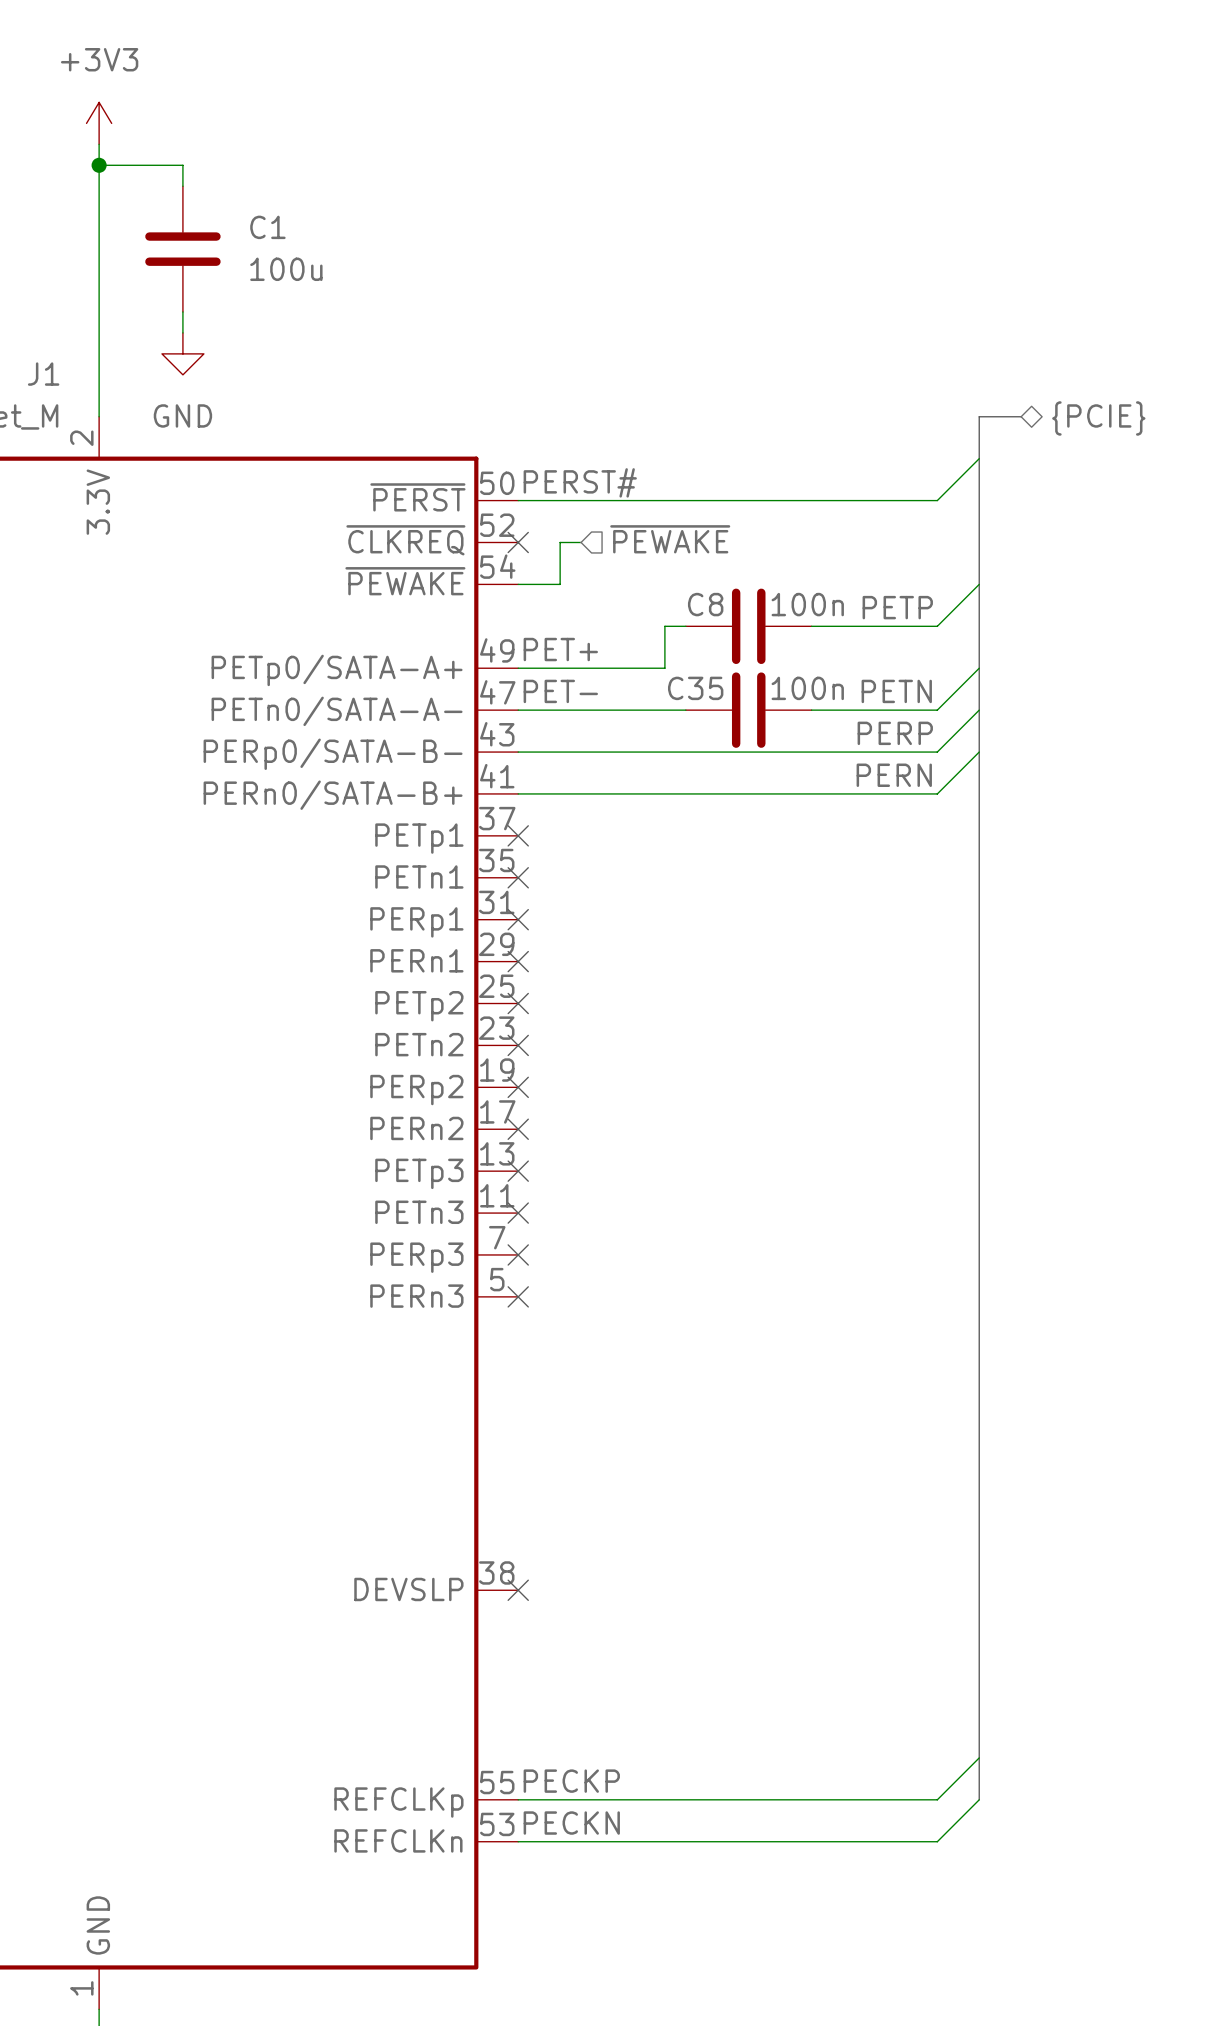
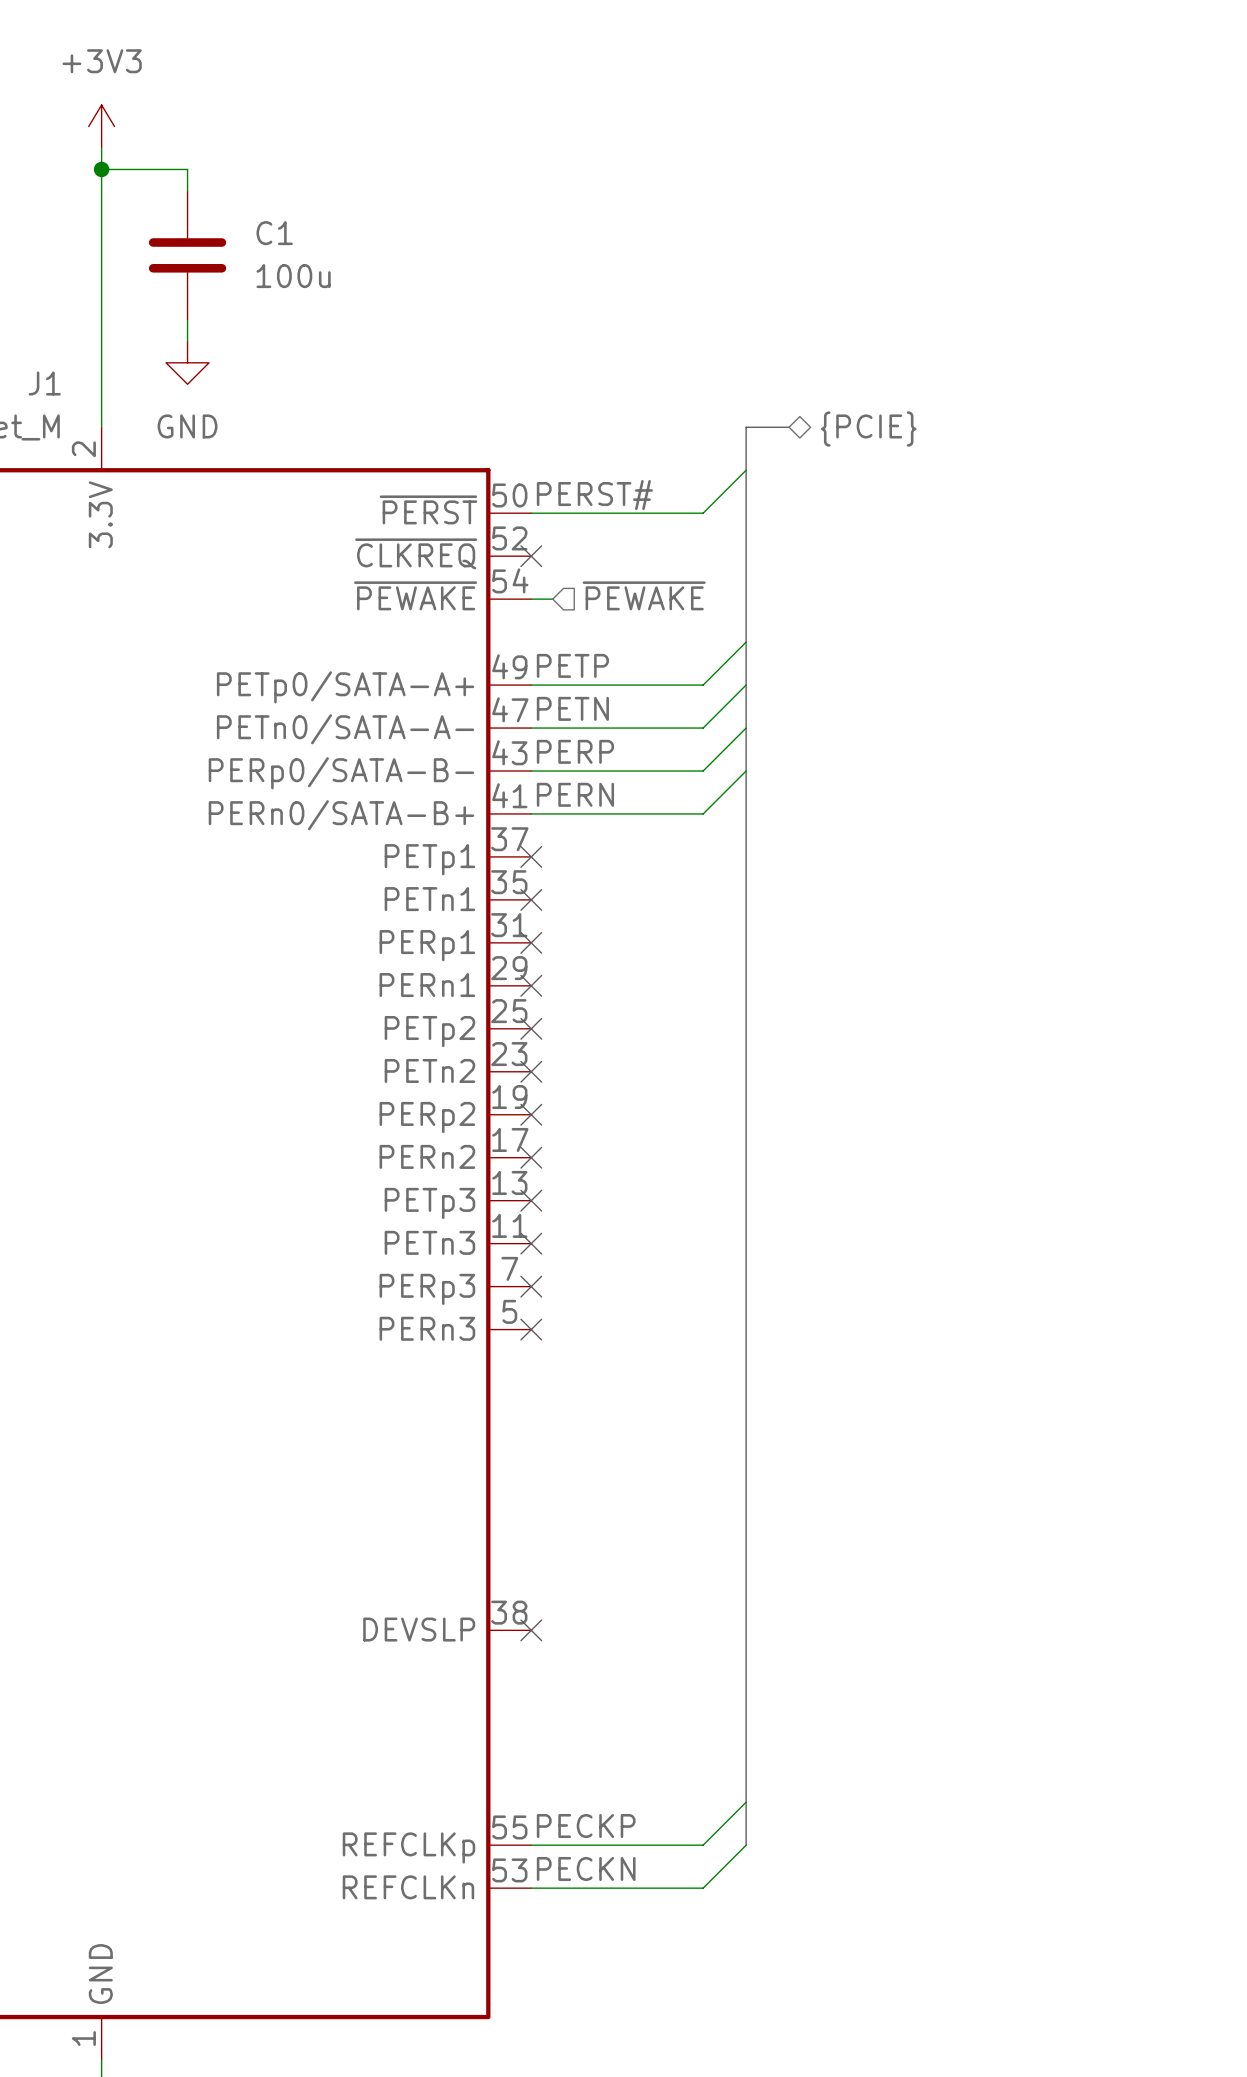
bus: (1021, 416) (979, 416) (979, 1799) -> (789, 427) (746, 427) (746, 1845)
hierarchical label position: {PCIE} (1098, 418) -> {PCIE} (868, 429)
wire: (979, 458) (937, 500) (685, 500) -> (746, 470) (703, 513)
hierarchical label position: ~{PEWAKE} (670, 539) -> ~{PEWAKE} (644, 595)
wire: (581, 542) (560, 542) (560, 584) (539, 584) -> none
wire: (979, 584) (937, 626) (811, 626) -> none
label: PETP (897, 607) -> none
wire: (685, 626) (664, 626) (664, 668) -> (746, 642) (703, 685) (681, 685)
C8: 100n (748, 626) -> none
label: PET+ (560, 649) -> PETP (572, 665)
wire: none -> (746, 685) (703, 728)
wire: (979, 668) (937, 710) (811, 710) -> none
label: PET- (560, 691) -> PETN (572, 708)
label: PETN (896, 691) -> none
C35: 100n (748, 710) -> none
wire: (979, 710) (937, 752) (685, 752) -> (746, 728) (703, 771)
label: none -> PERP (575, 751)
label: PERP (895, 733) -> none
wire: (979, 752) (937, 793) (685, 793) -> (746, 771) (703, 813)
label: none -> PERN (575, 794)
label: PERN (894, 775) -> none
wire: (979, 1757) (937, 1799) (685, 1799) -> (746, 1802) (703, 1845)
wire: (979, 1799) (937, 1841) (685, 1841) -> (746, 1845) (703, 1888)

